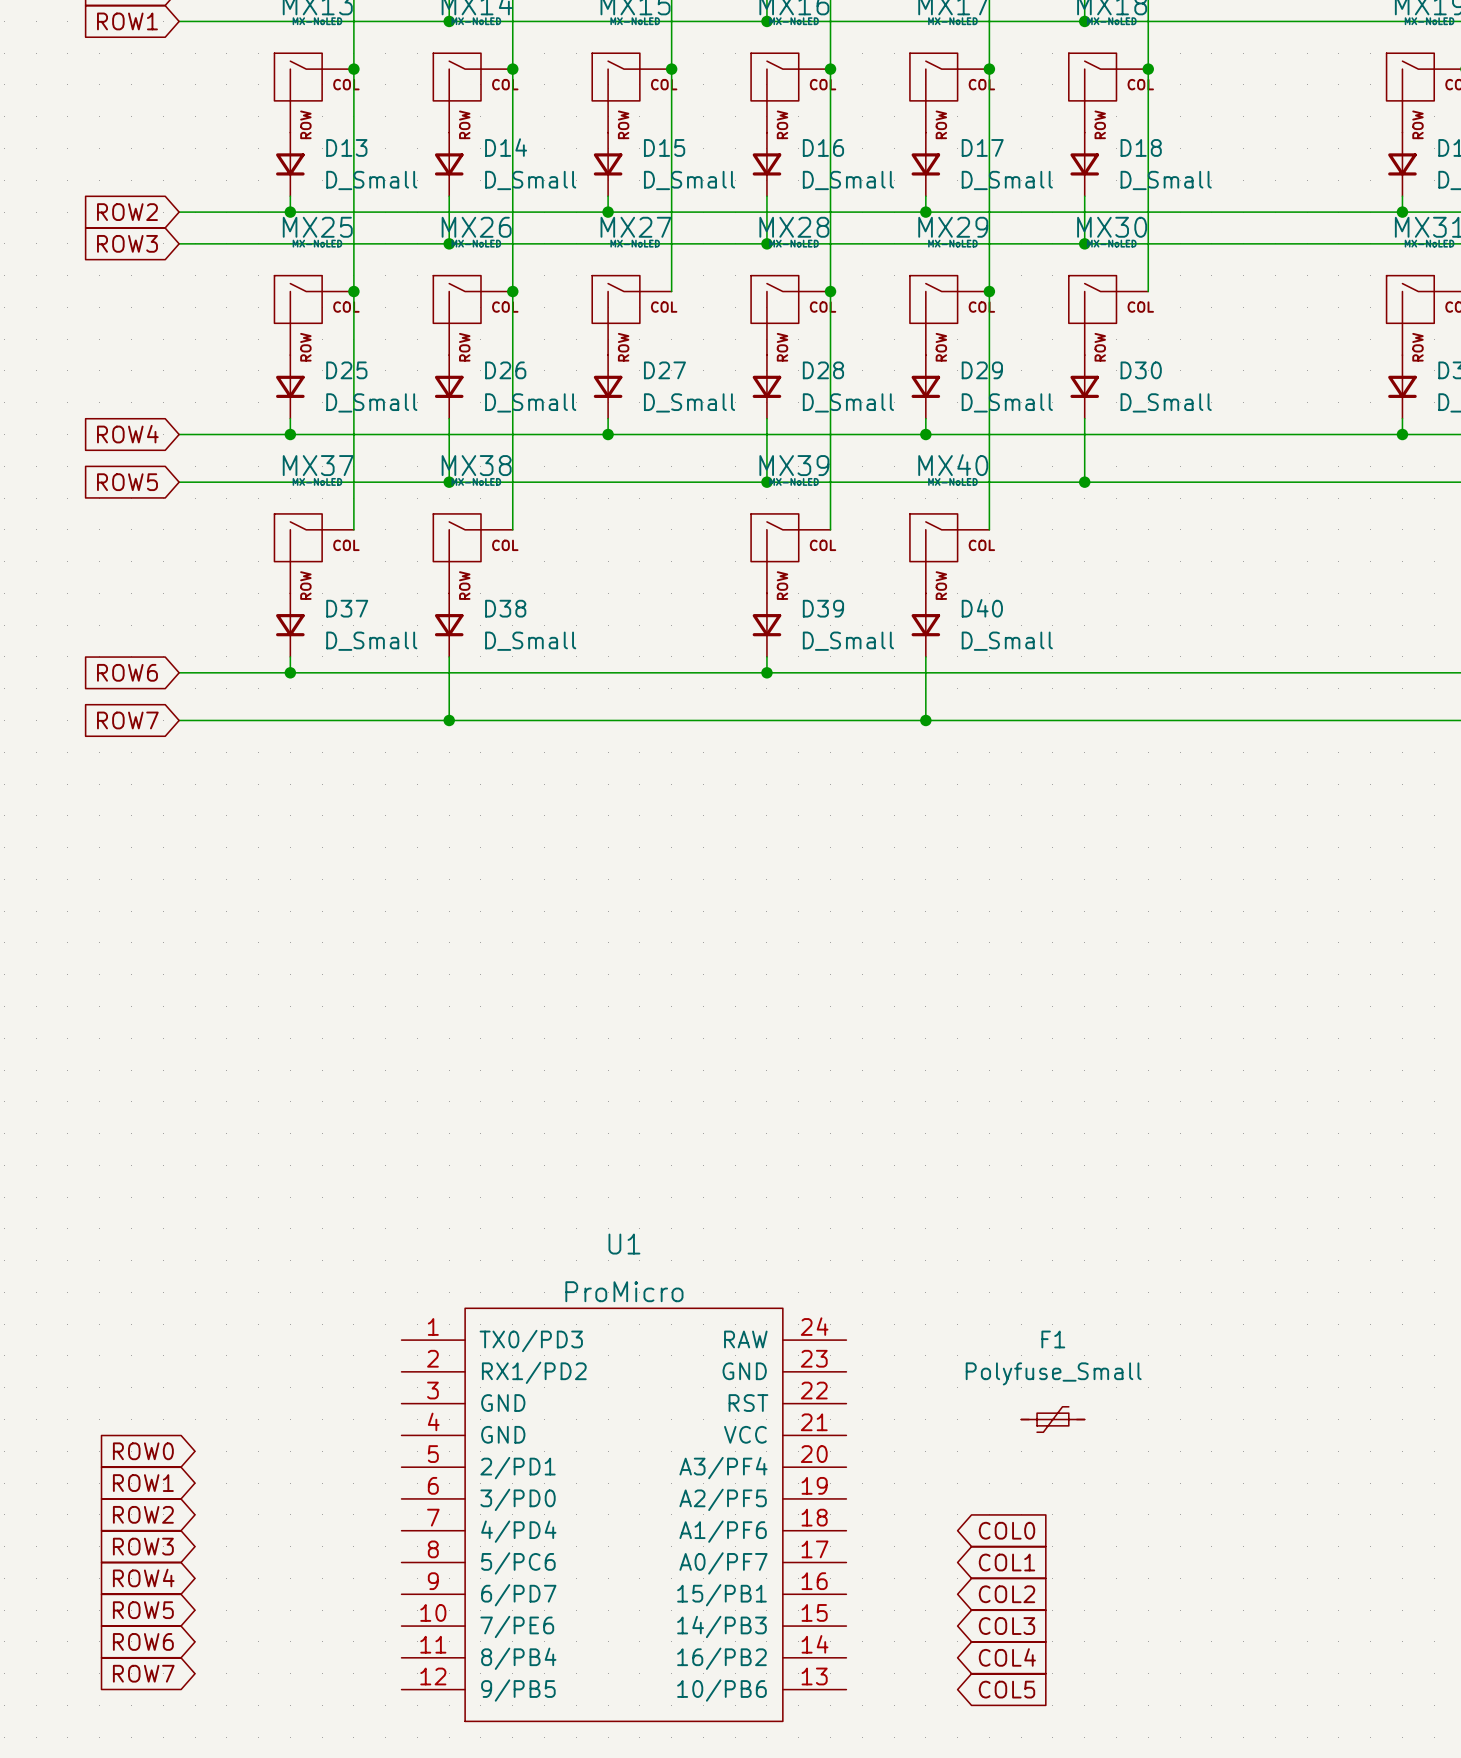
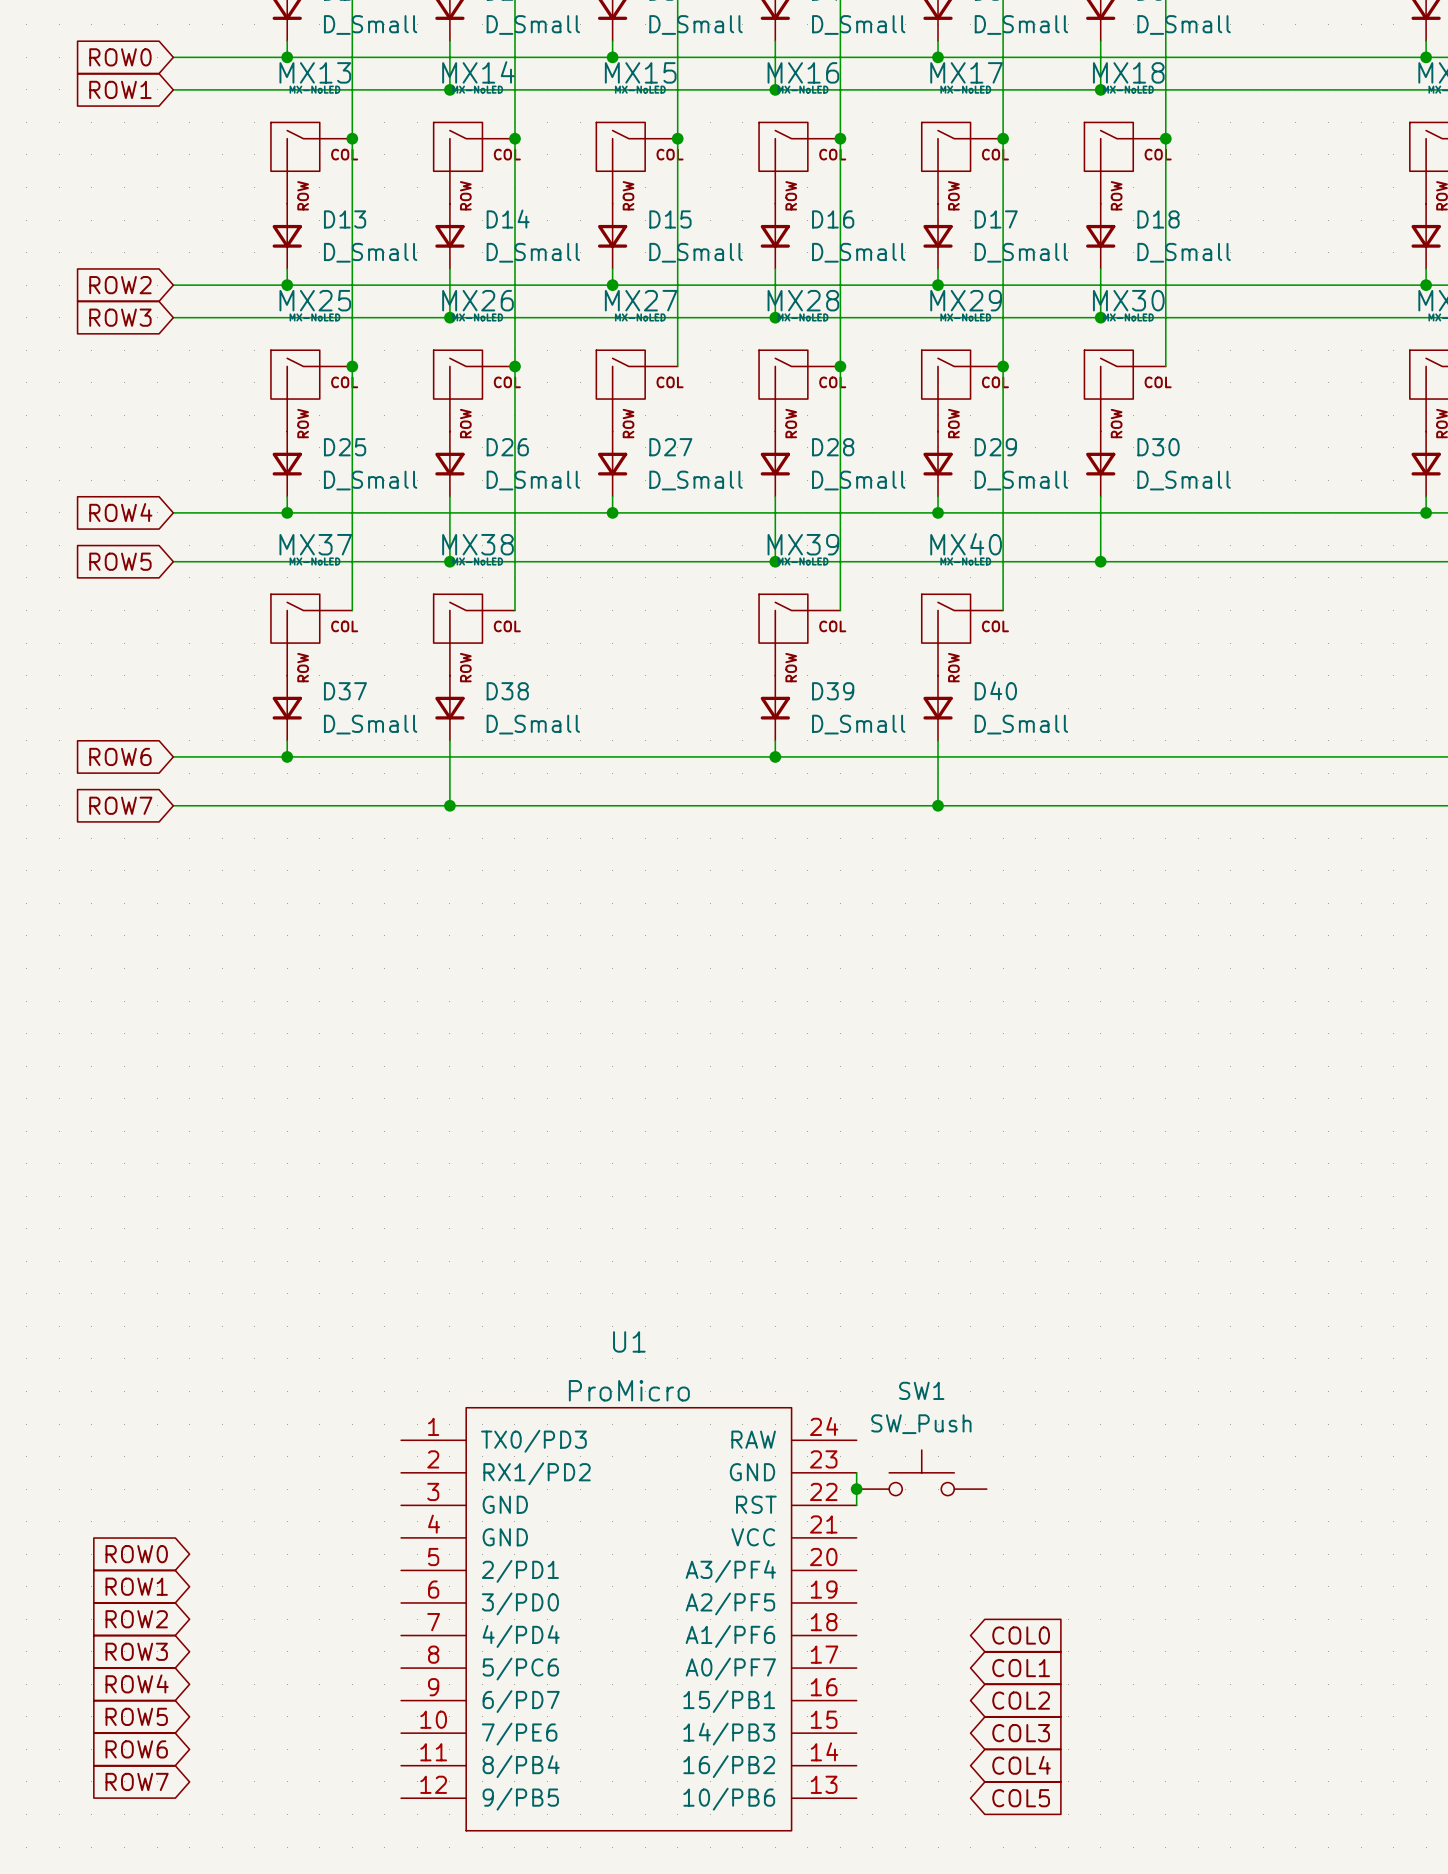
wire: none -> (856, 1472) (856, 1505)
SW1: none -> SW_Push (921, 1472)
junction: none -> (856, 1489)
F1: Polyfuse_Small (1052, 1419) -> none

